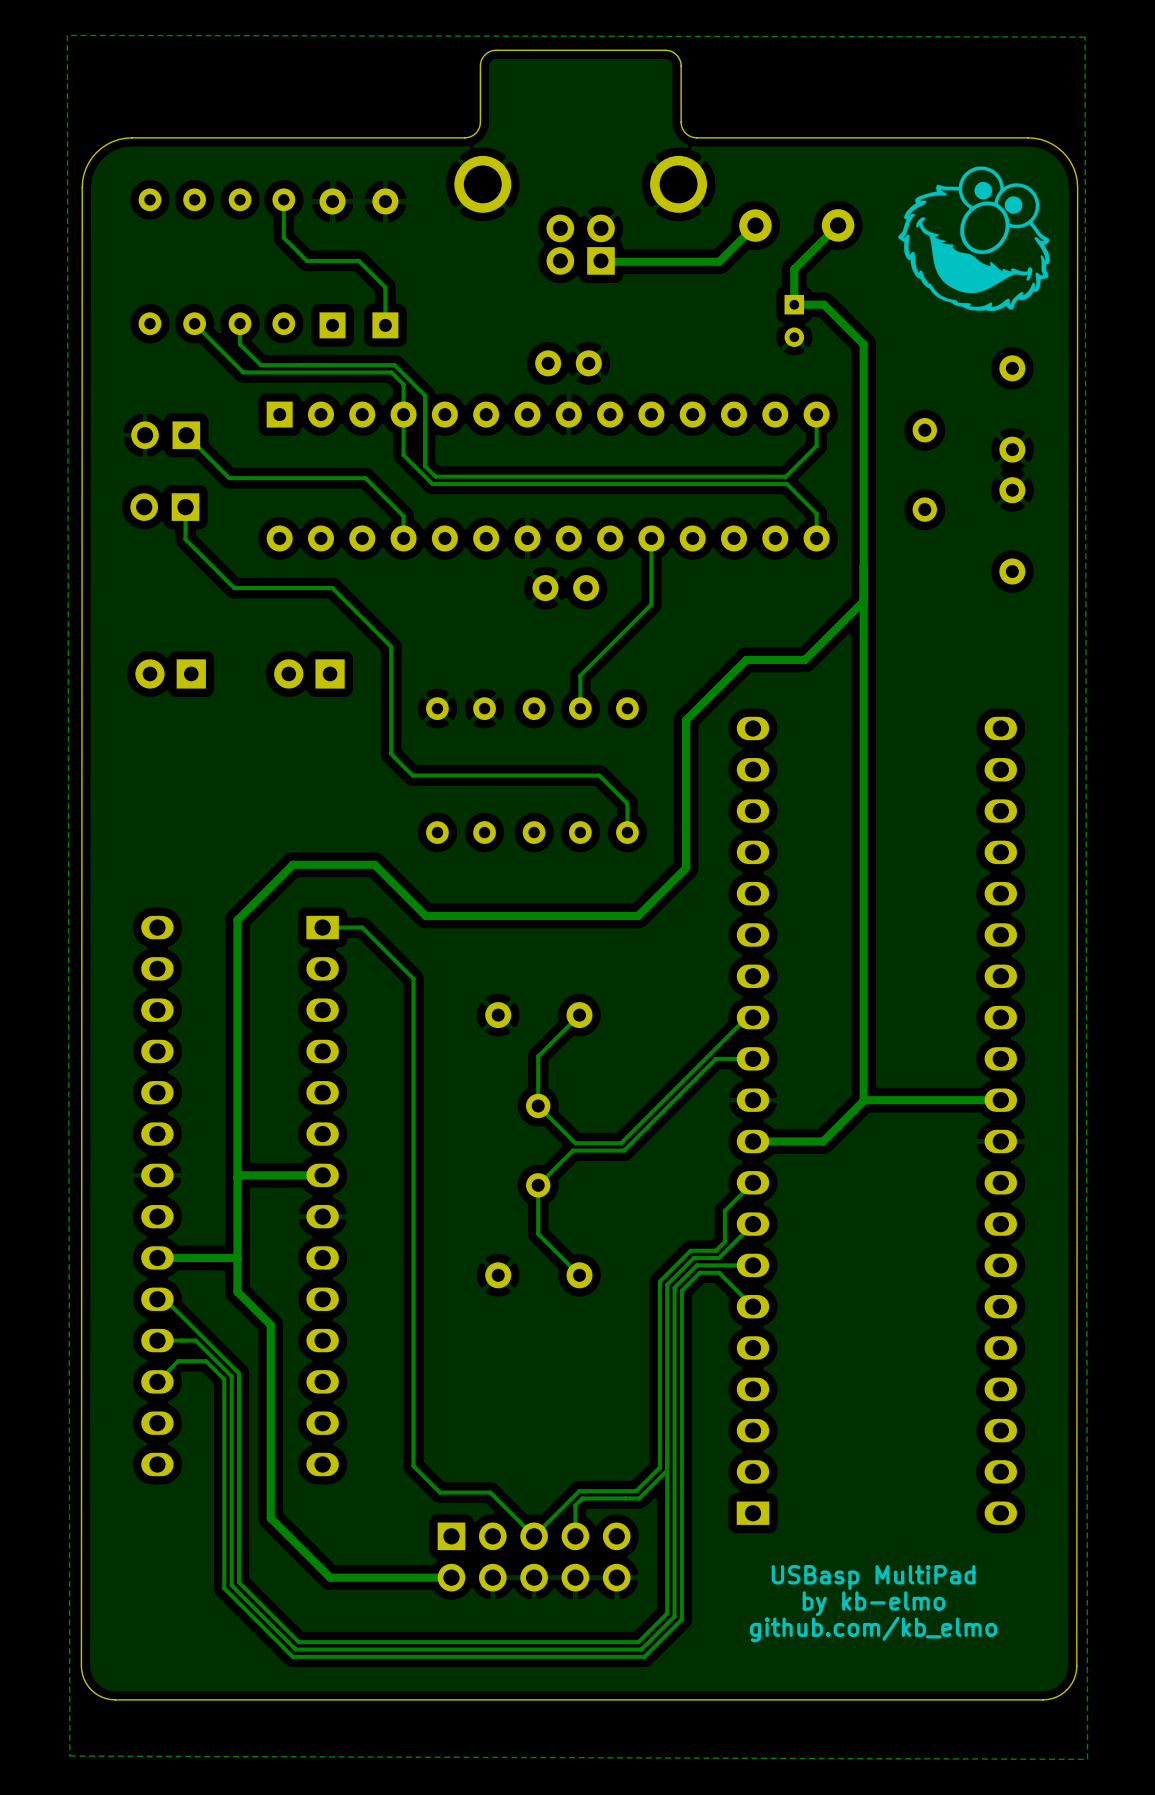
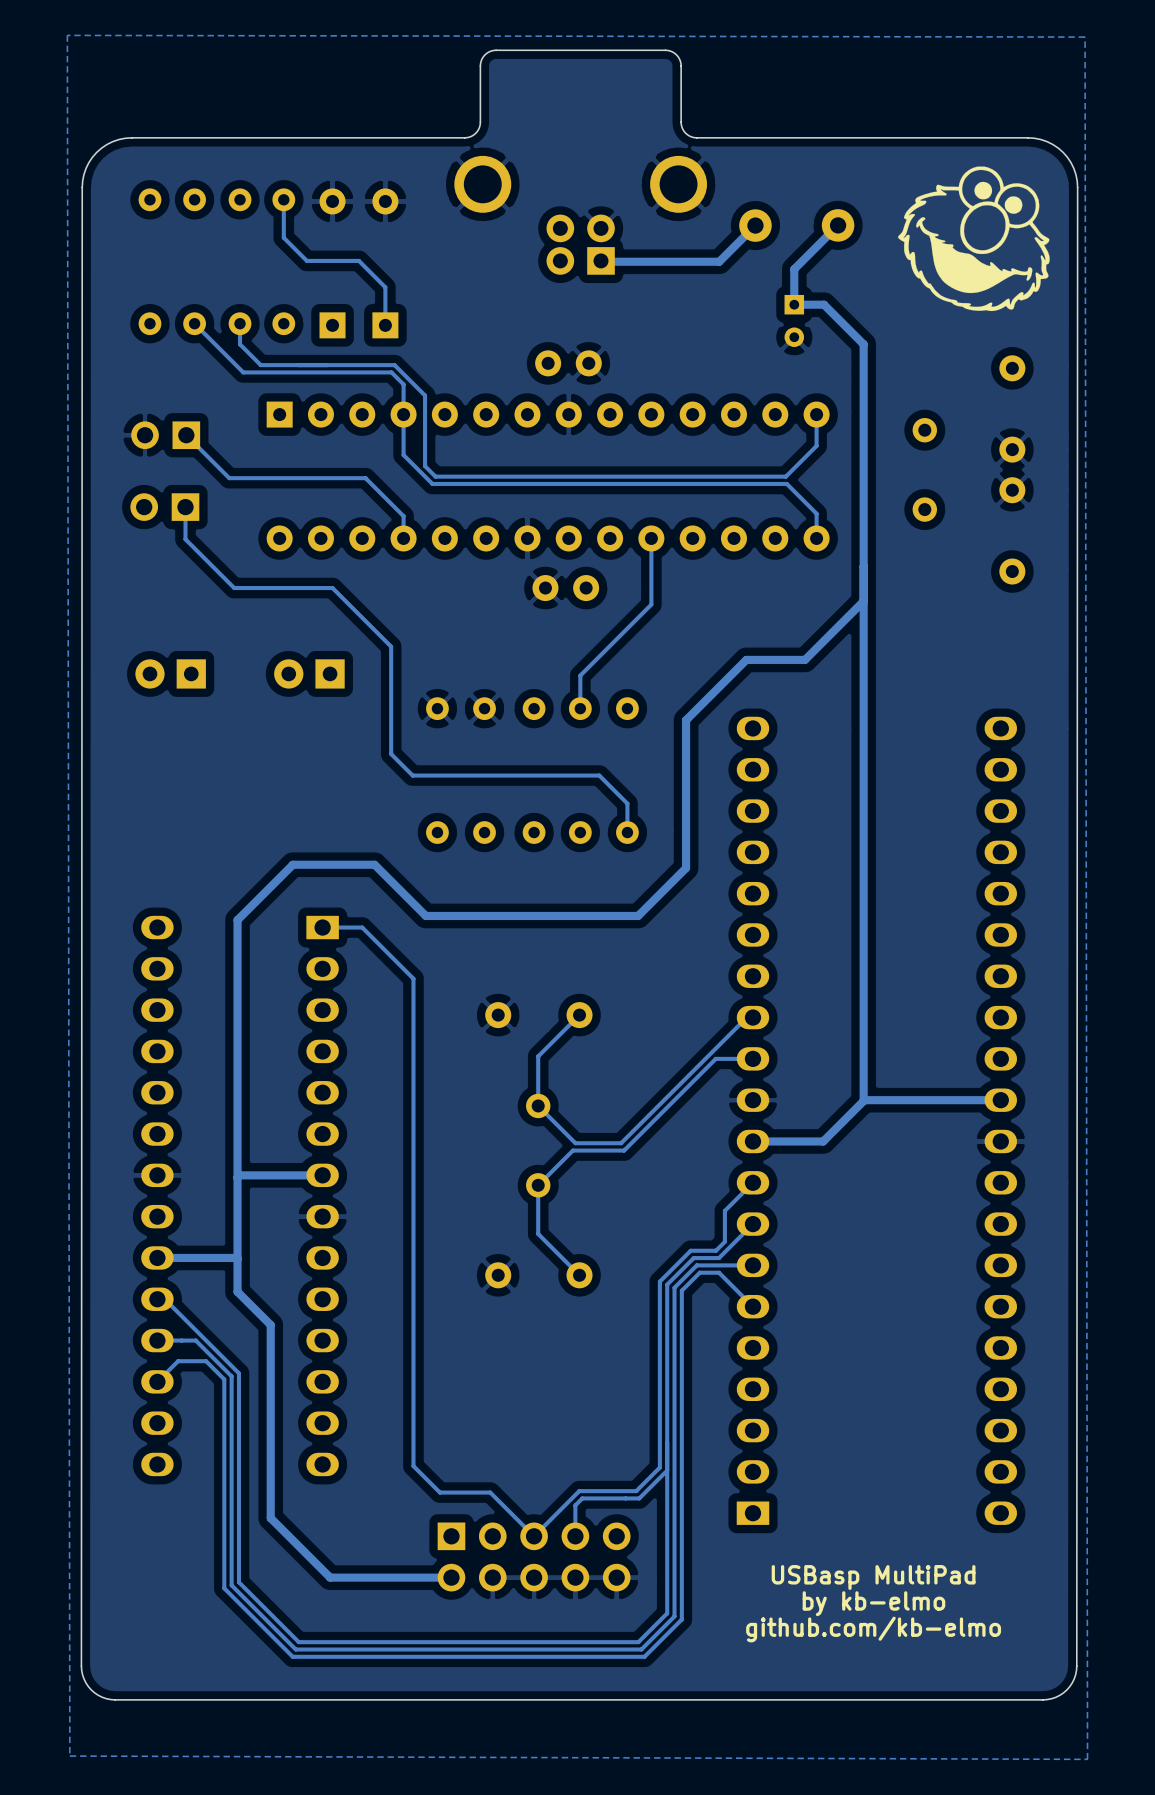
text: github.com/kb_elmo (873, 1629) -> github.com/kb-elmo (873, 1629)

